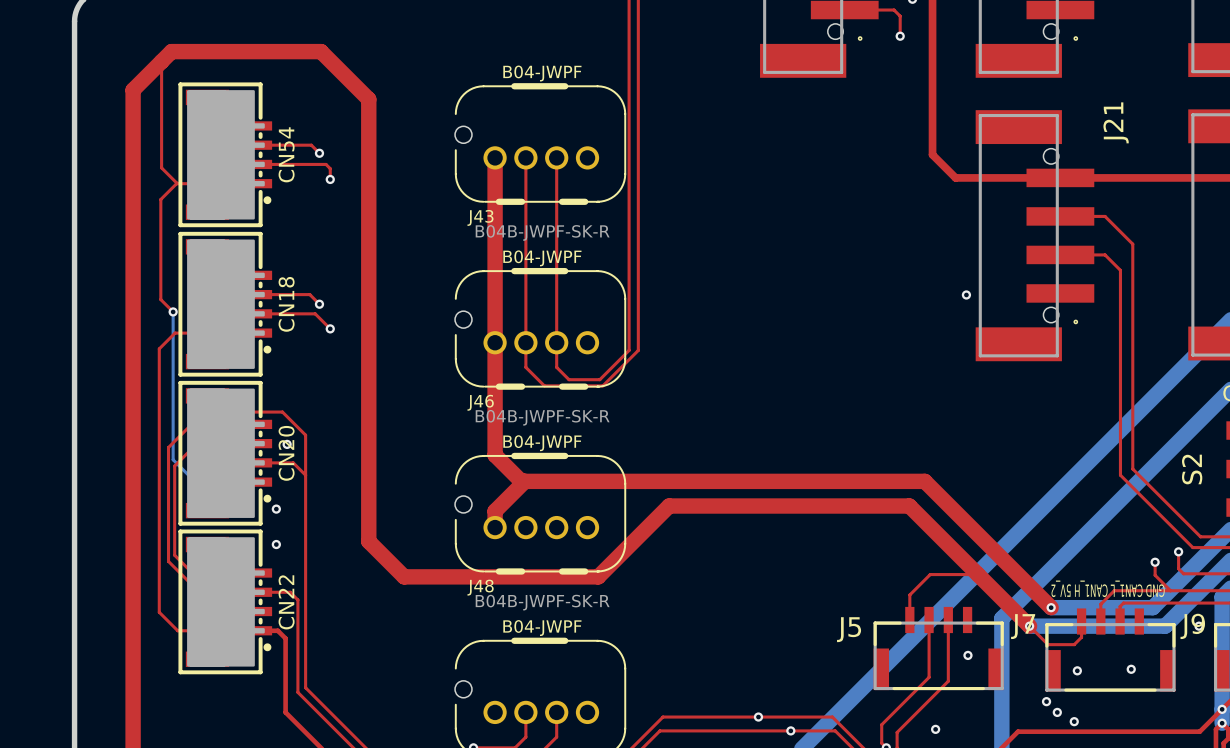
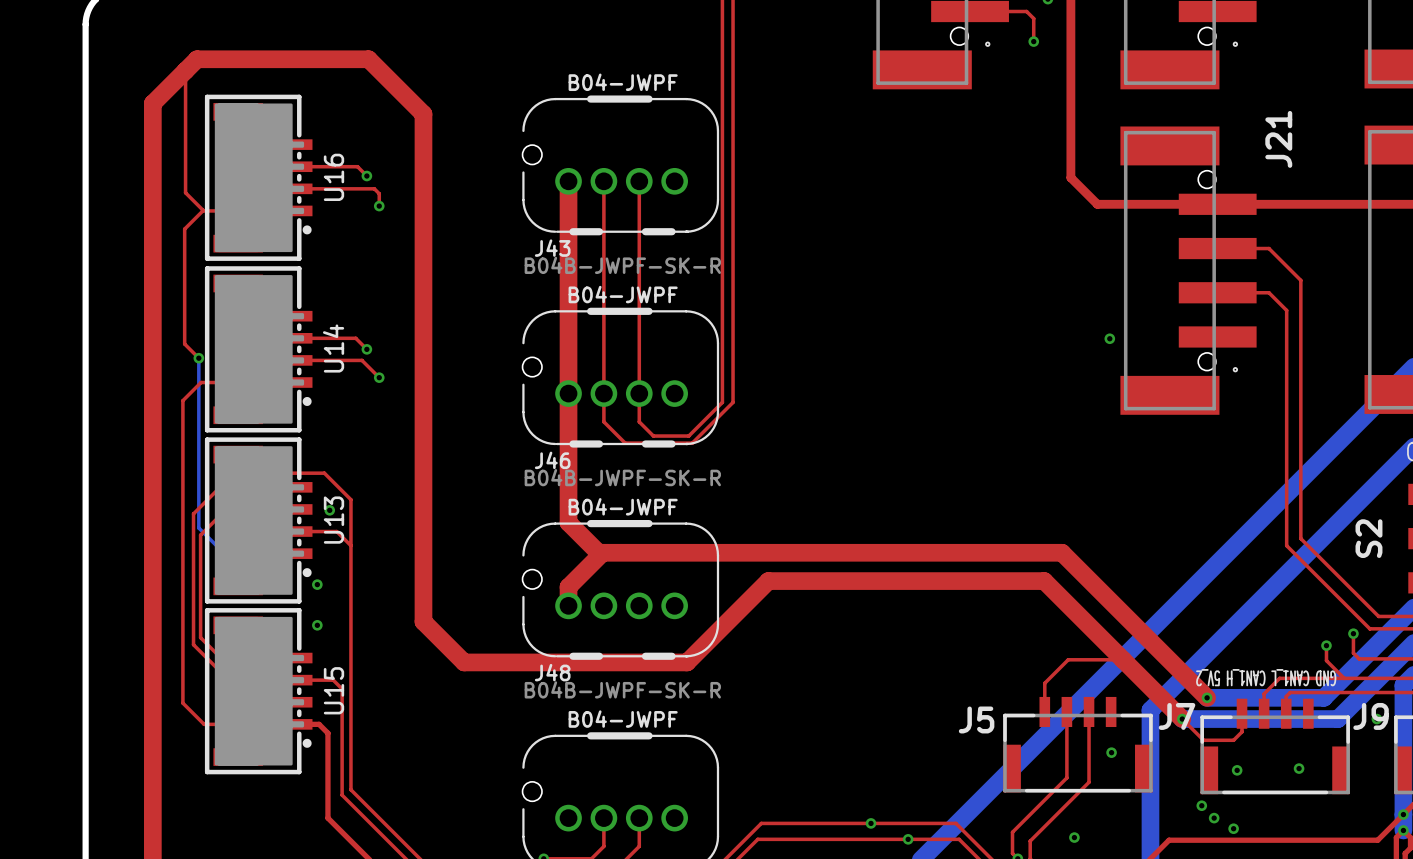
CN54 name: CN54 (286, 154) -> U16 (333, 177)
CN18 name: CN18 (286, 304) -> U14 (333, 348)
CN20 name: CN20 (286, 453) -> U13 (333, 520)
CN22 name: CN22 (286, 602) -> U15 (333, 690)

